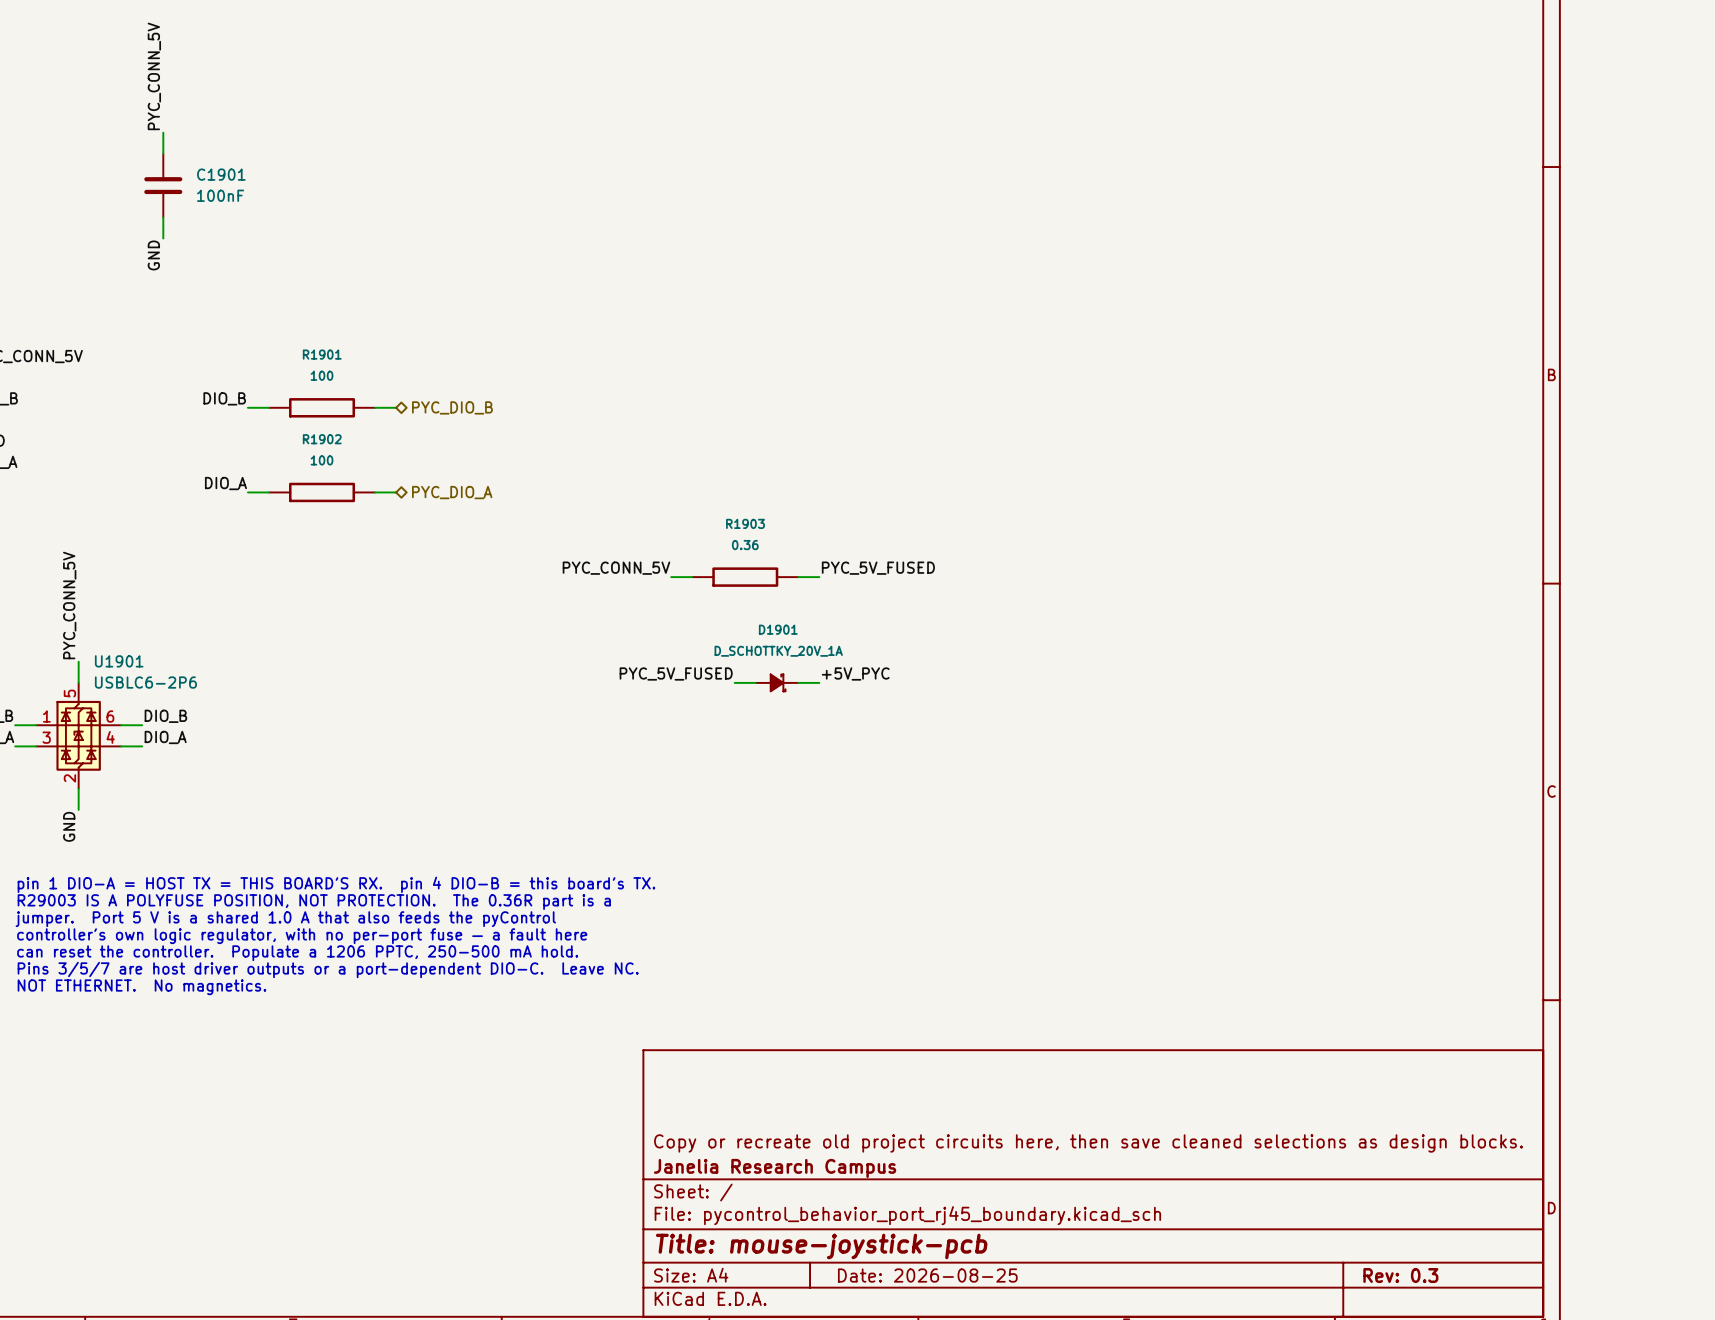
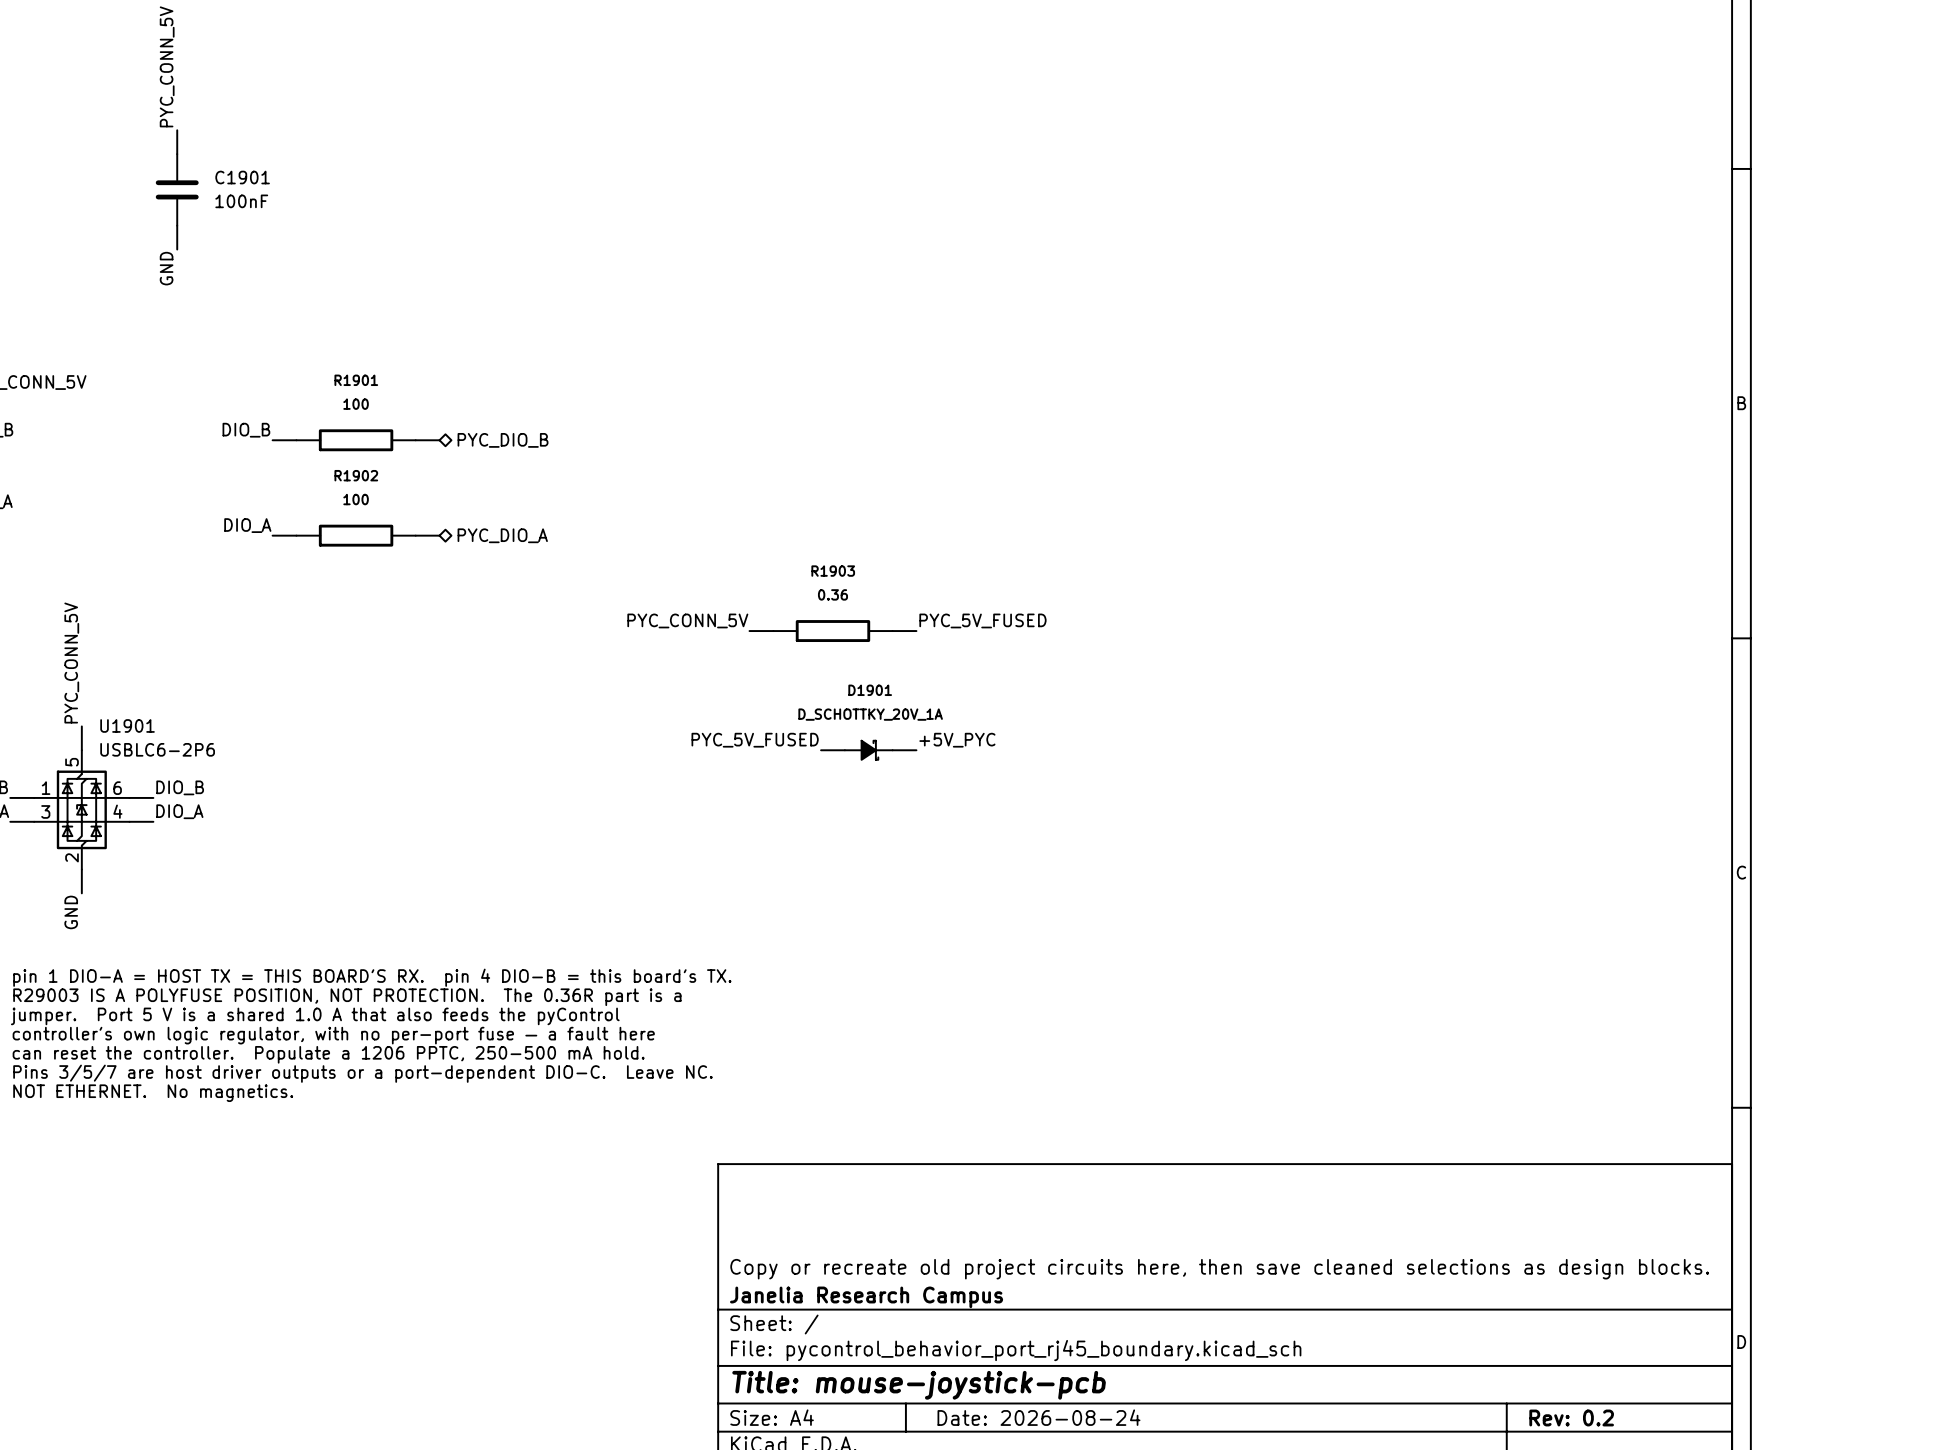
title block: Date: 2026-08-25 (927, 1275) -> Date: 2026-08-24 (1038, 1417)
title block: Rev: 0.3 (1400, 1275) -> Rev: 0.2 (1571, 1417)

